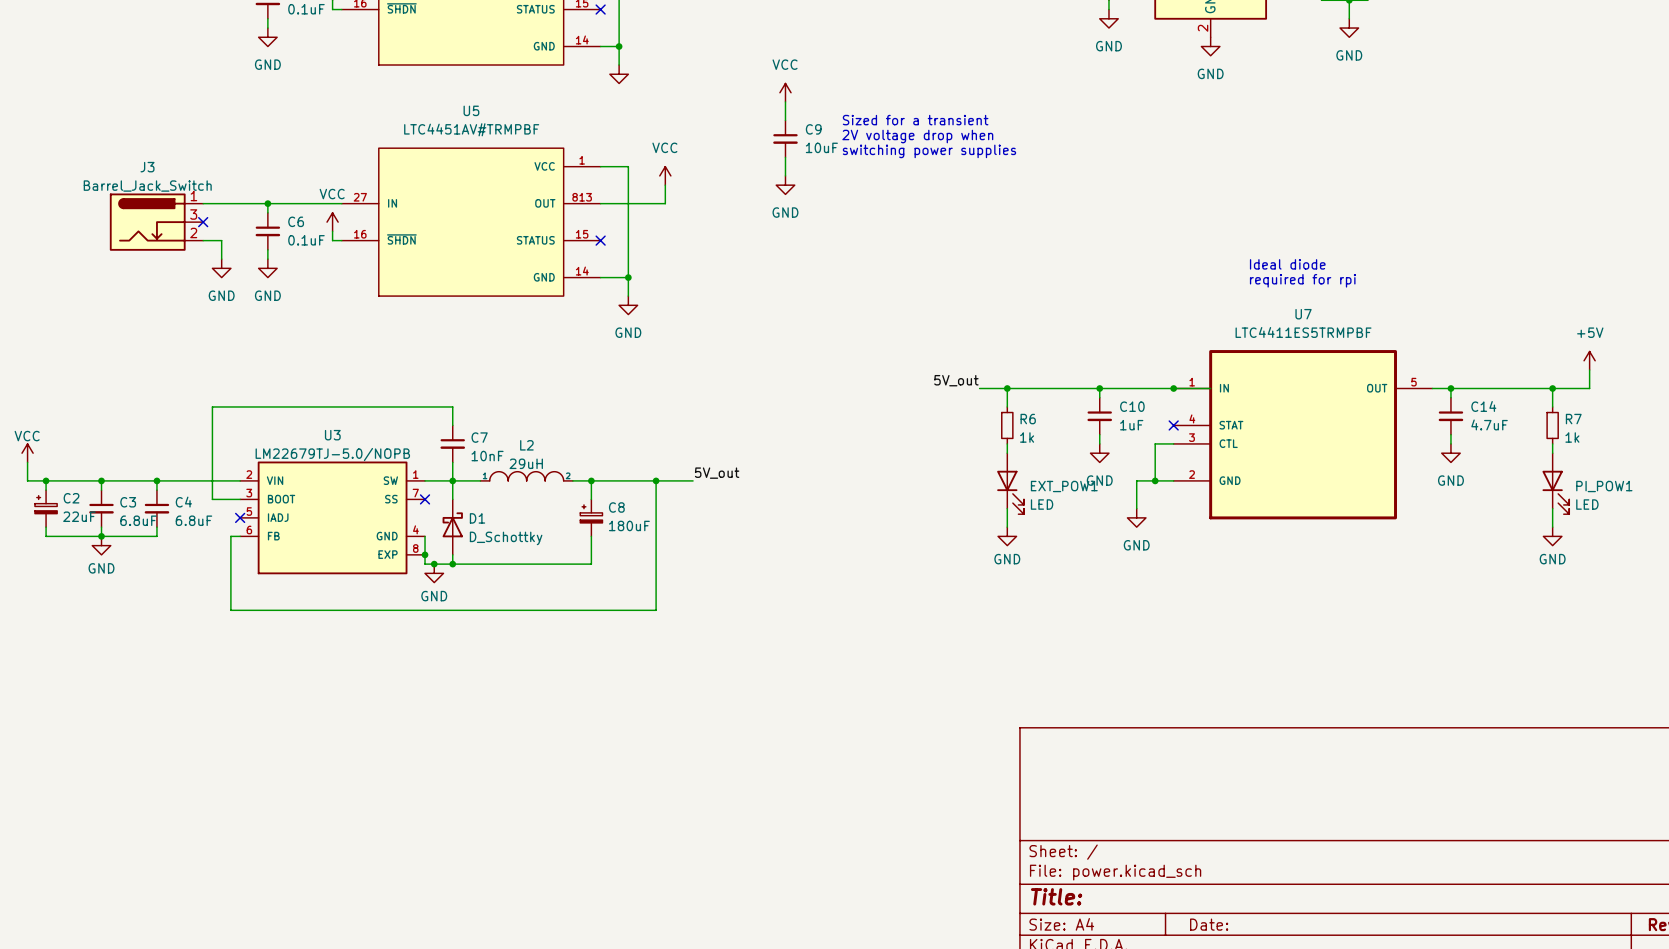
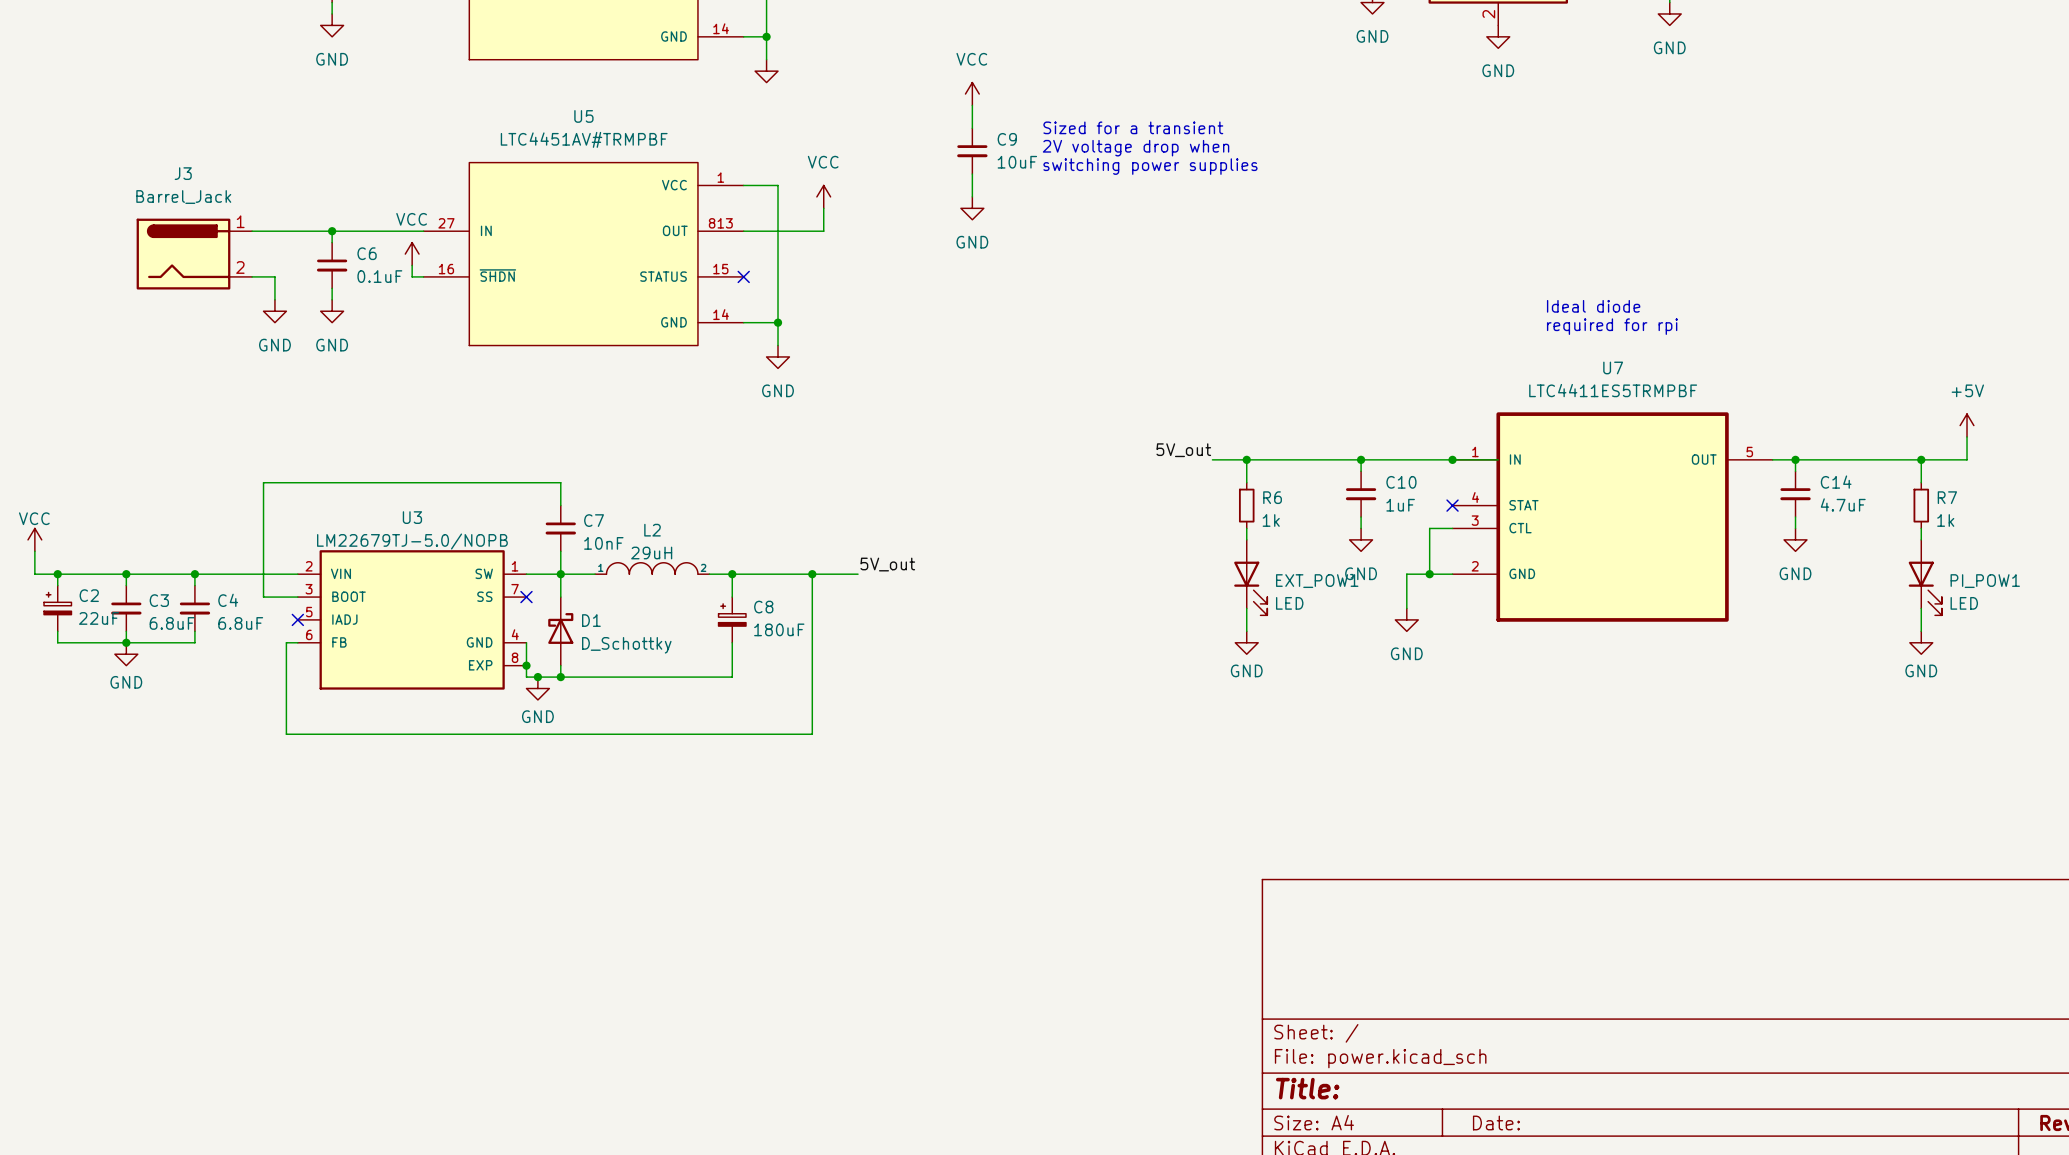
J3 value: Barrel_Jack_Switch (147, 186) -> Barrel_Jack (183, 197)
J3 symbol: [109, 193, 204, 251] -> [136, 218, 253, 290]
no-connect mark: (203, 222) -> none

